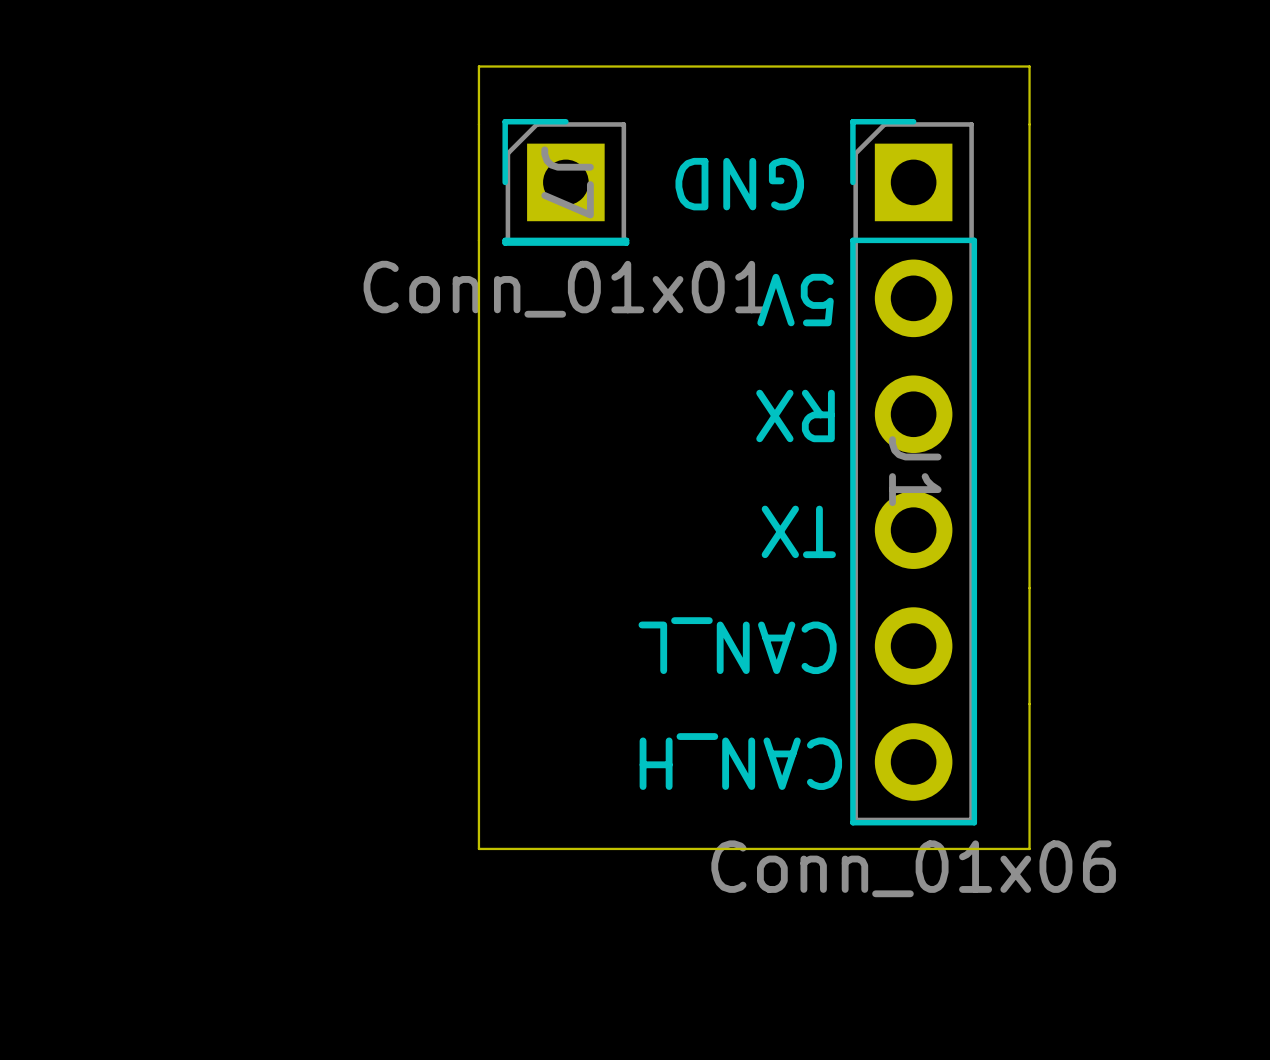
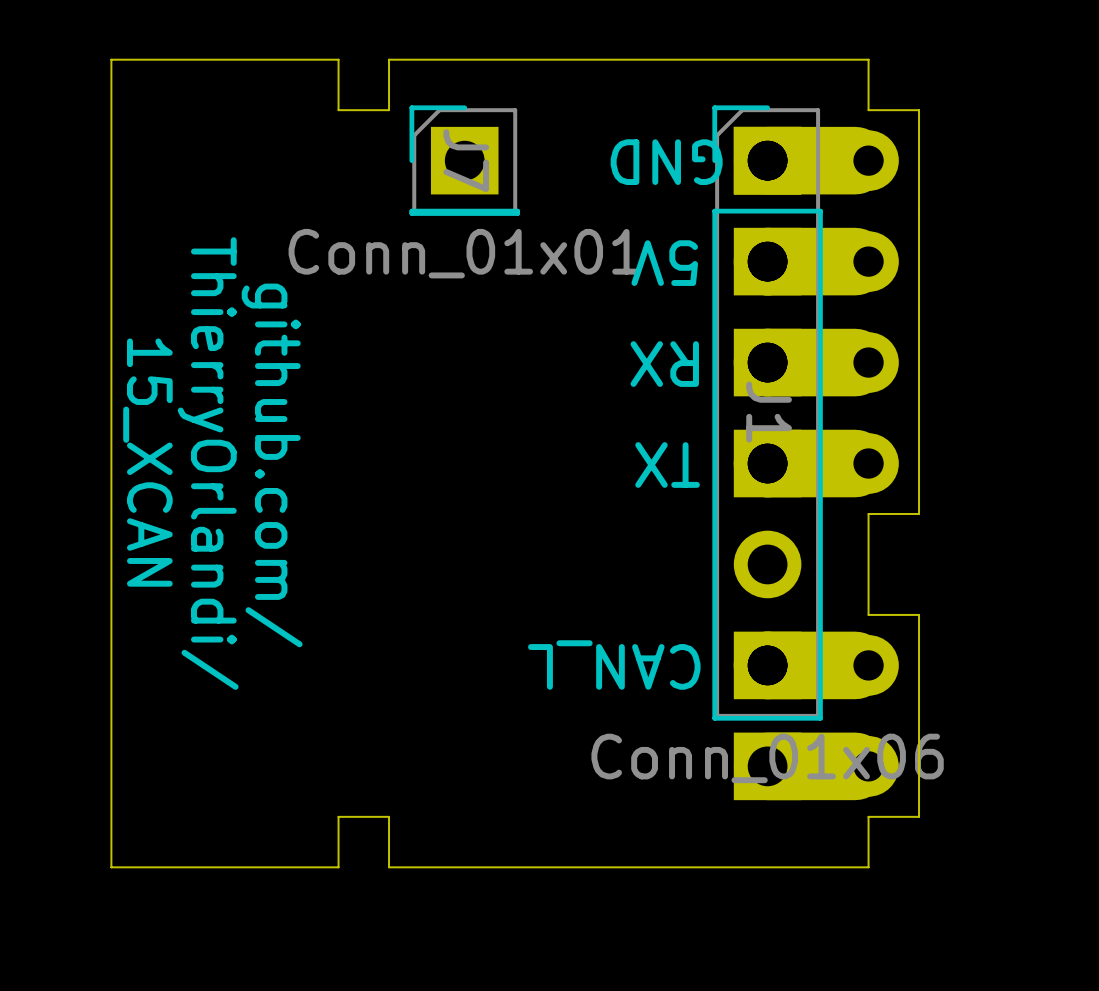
board edge: (478, 124) (478, 848) (1029, 848) (1029, 704) -> (389, 110) (338, 110) (338, 59) (111, 59) (111, 867) (338, 867) (338, 816) (389, 816) (389, 867) (868, 867) (868, 816) (919, 816) (919, 614) (868, 614)
board edge: (1029, 124) (1029, 588) -> (868, 110) (919, 110) (919, 513) (868, 513)
part: none -> (816, 160)
text position: GND (739, 184) -> GND (666, 162)
part: none -> (816, 261)
part: none -> (816, 362)
text: none -> 15_XCAN (147, 462)
text: none -> ThierryOrlandi/ (208, 463)
part: none -> (816, 463)
text: none -> github.com/ (272, 465)
text: CAN_L (737, 645) -> none
text: CAN_H (740, 761) -> CAN_L (614, 665)
part: none -> (816, 665)
part: none -> (816, 766)

